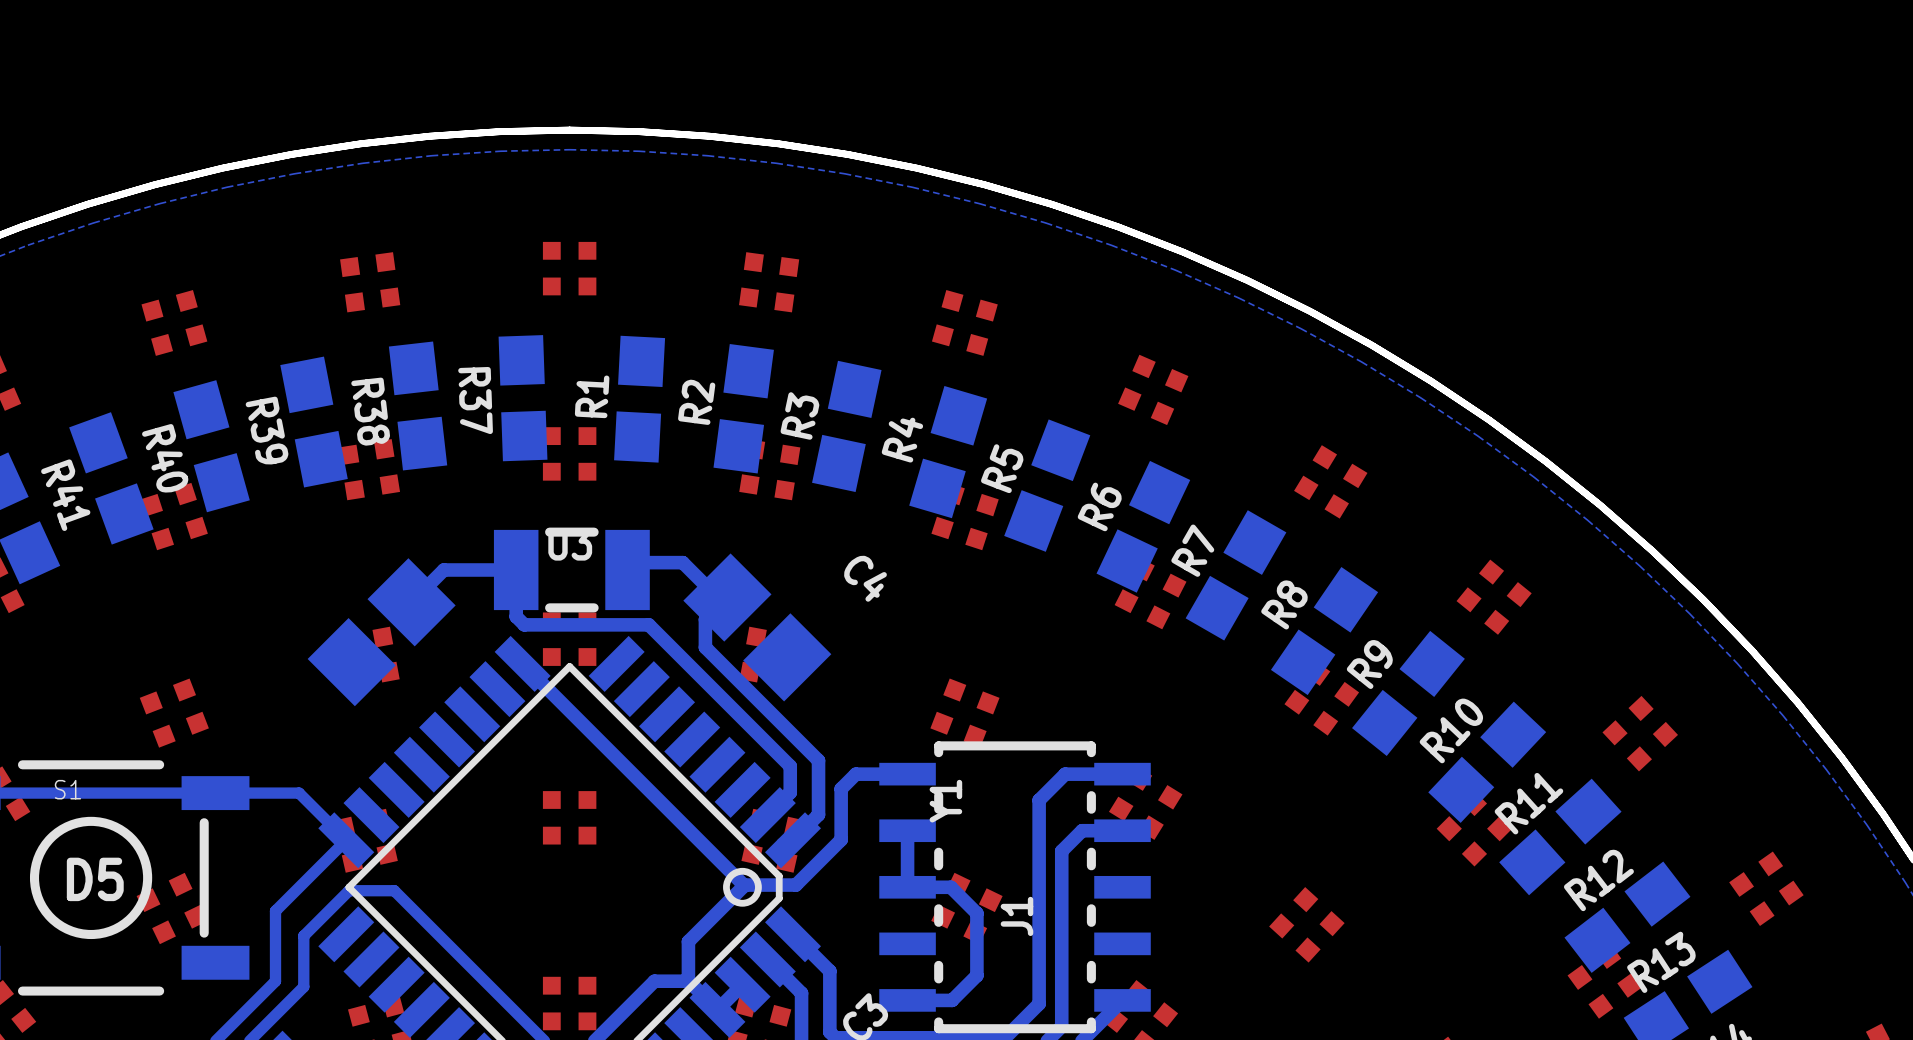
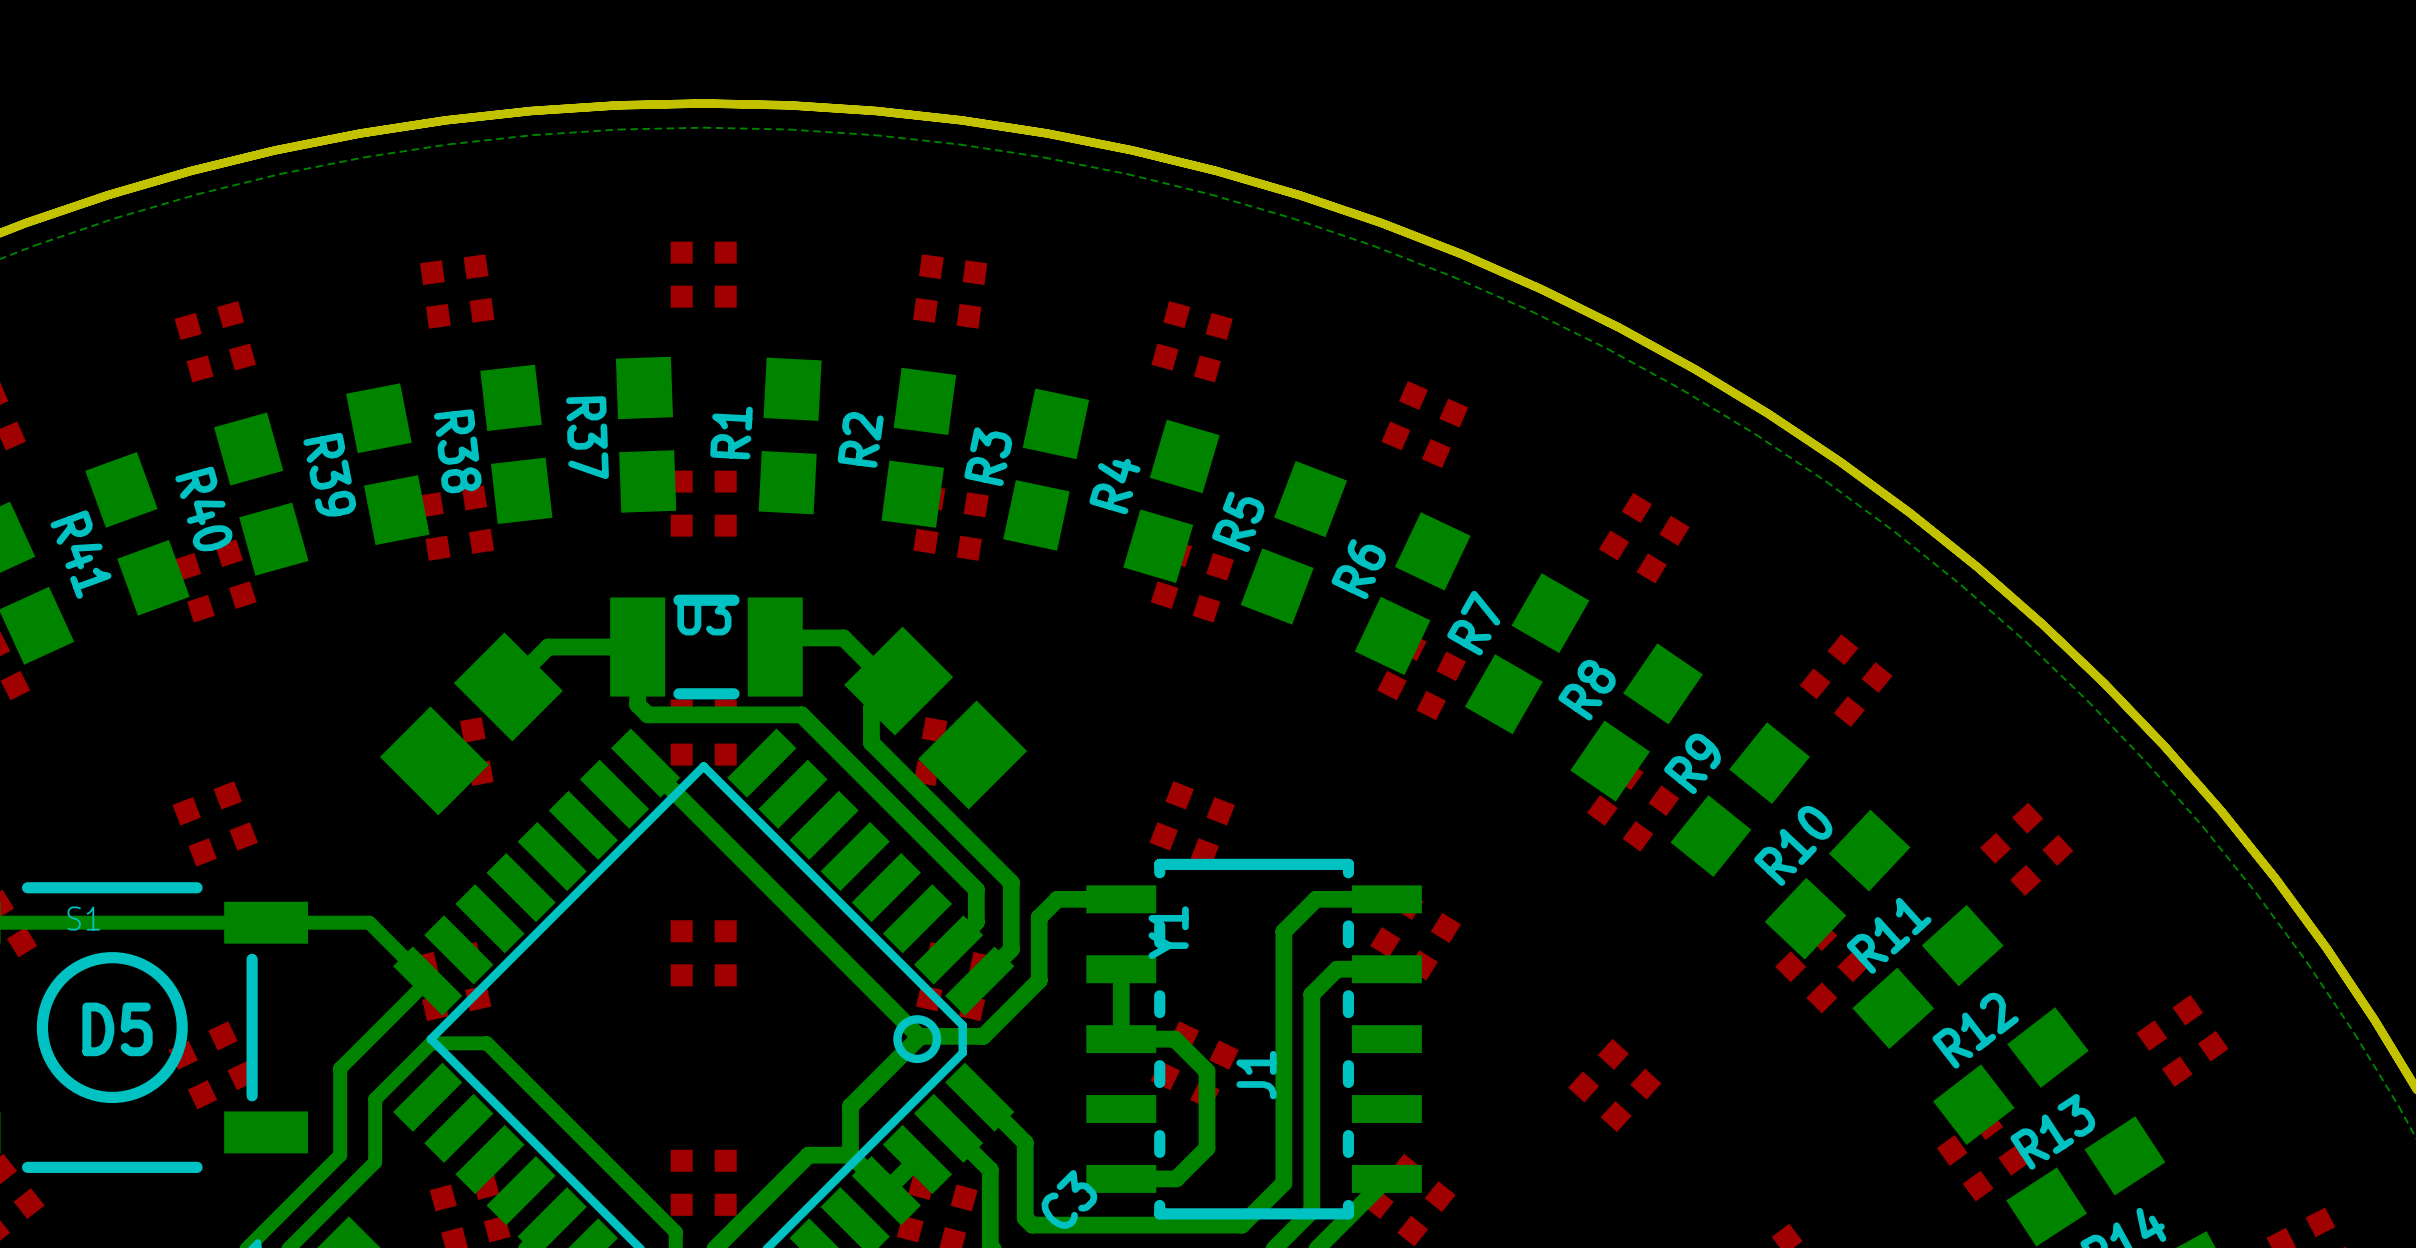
C4 name: C4 (865, 578) -> none

